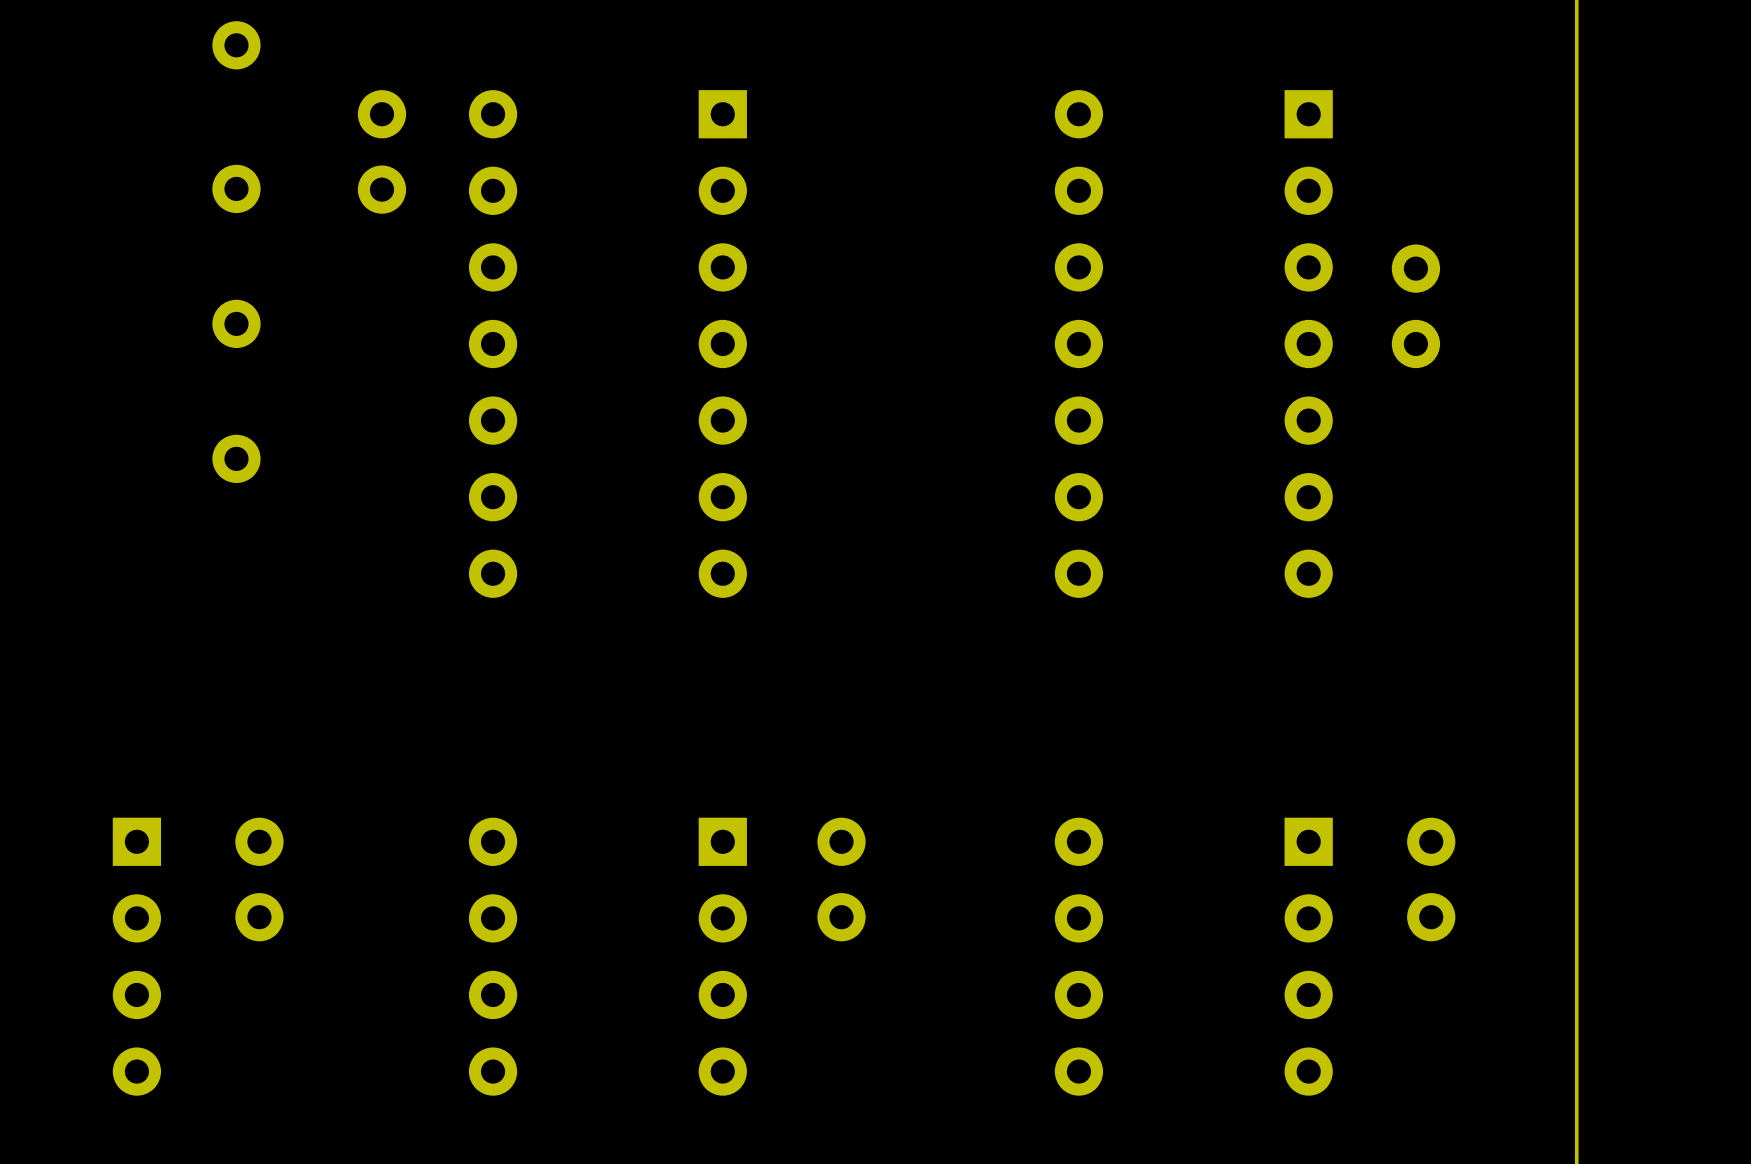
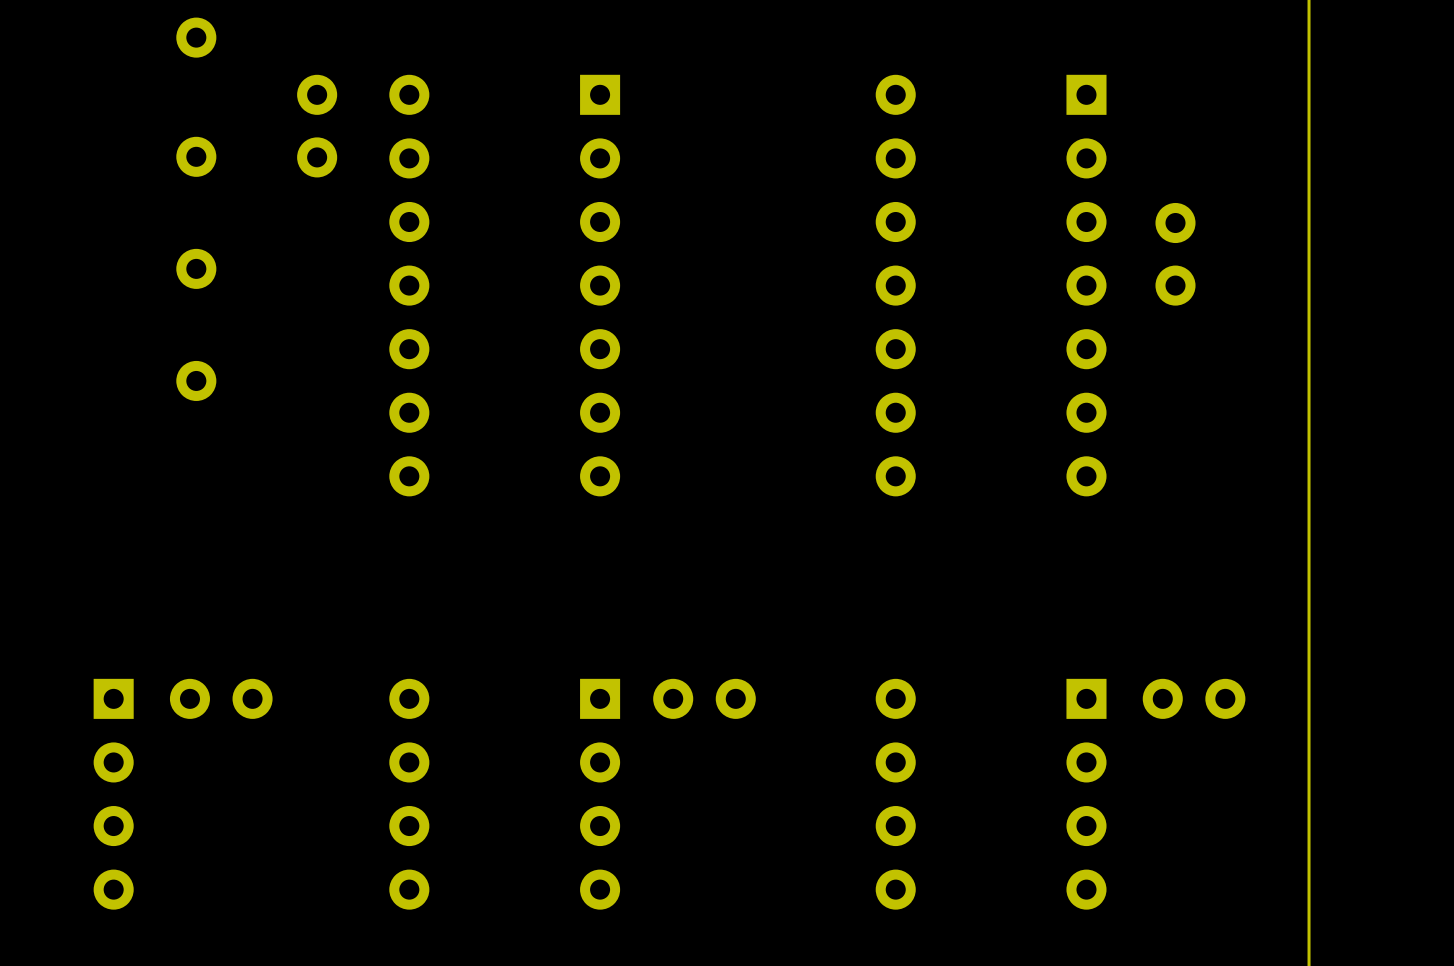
part rotation: 0° (259, 879) -> 90° clockwise (221, 698)
part rotation: 0° (841, 879) -> 90° clockwise (704, 698)
part rotation: 0° (1431, 879) -> 90° clockwise (1194, 698)

